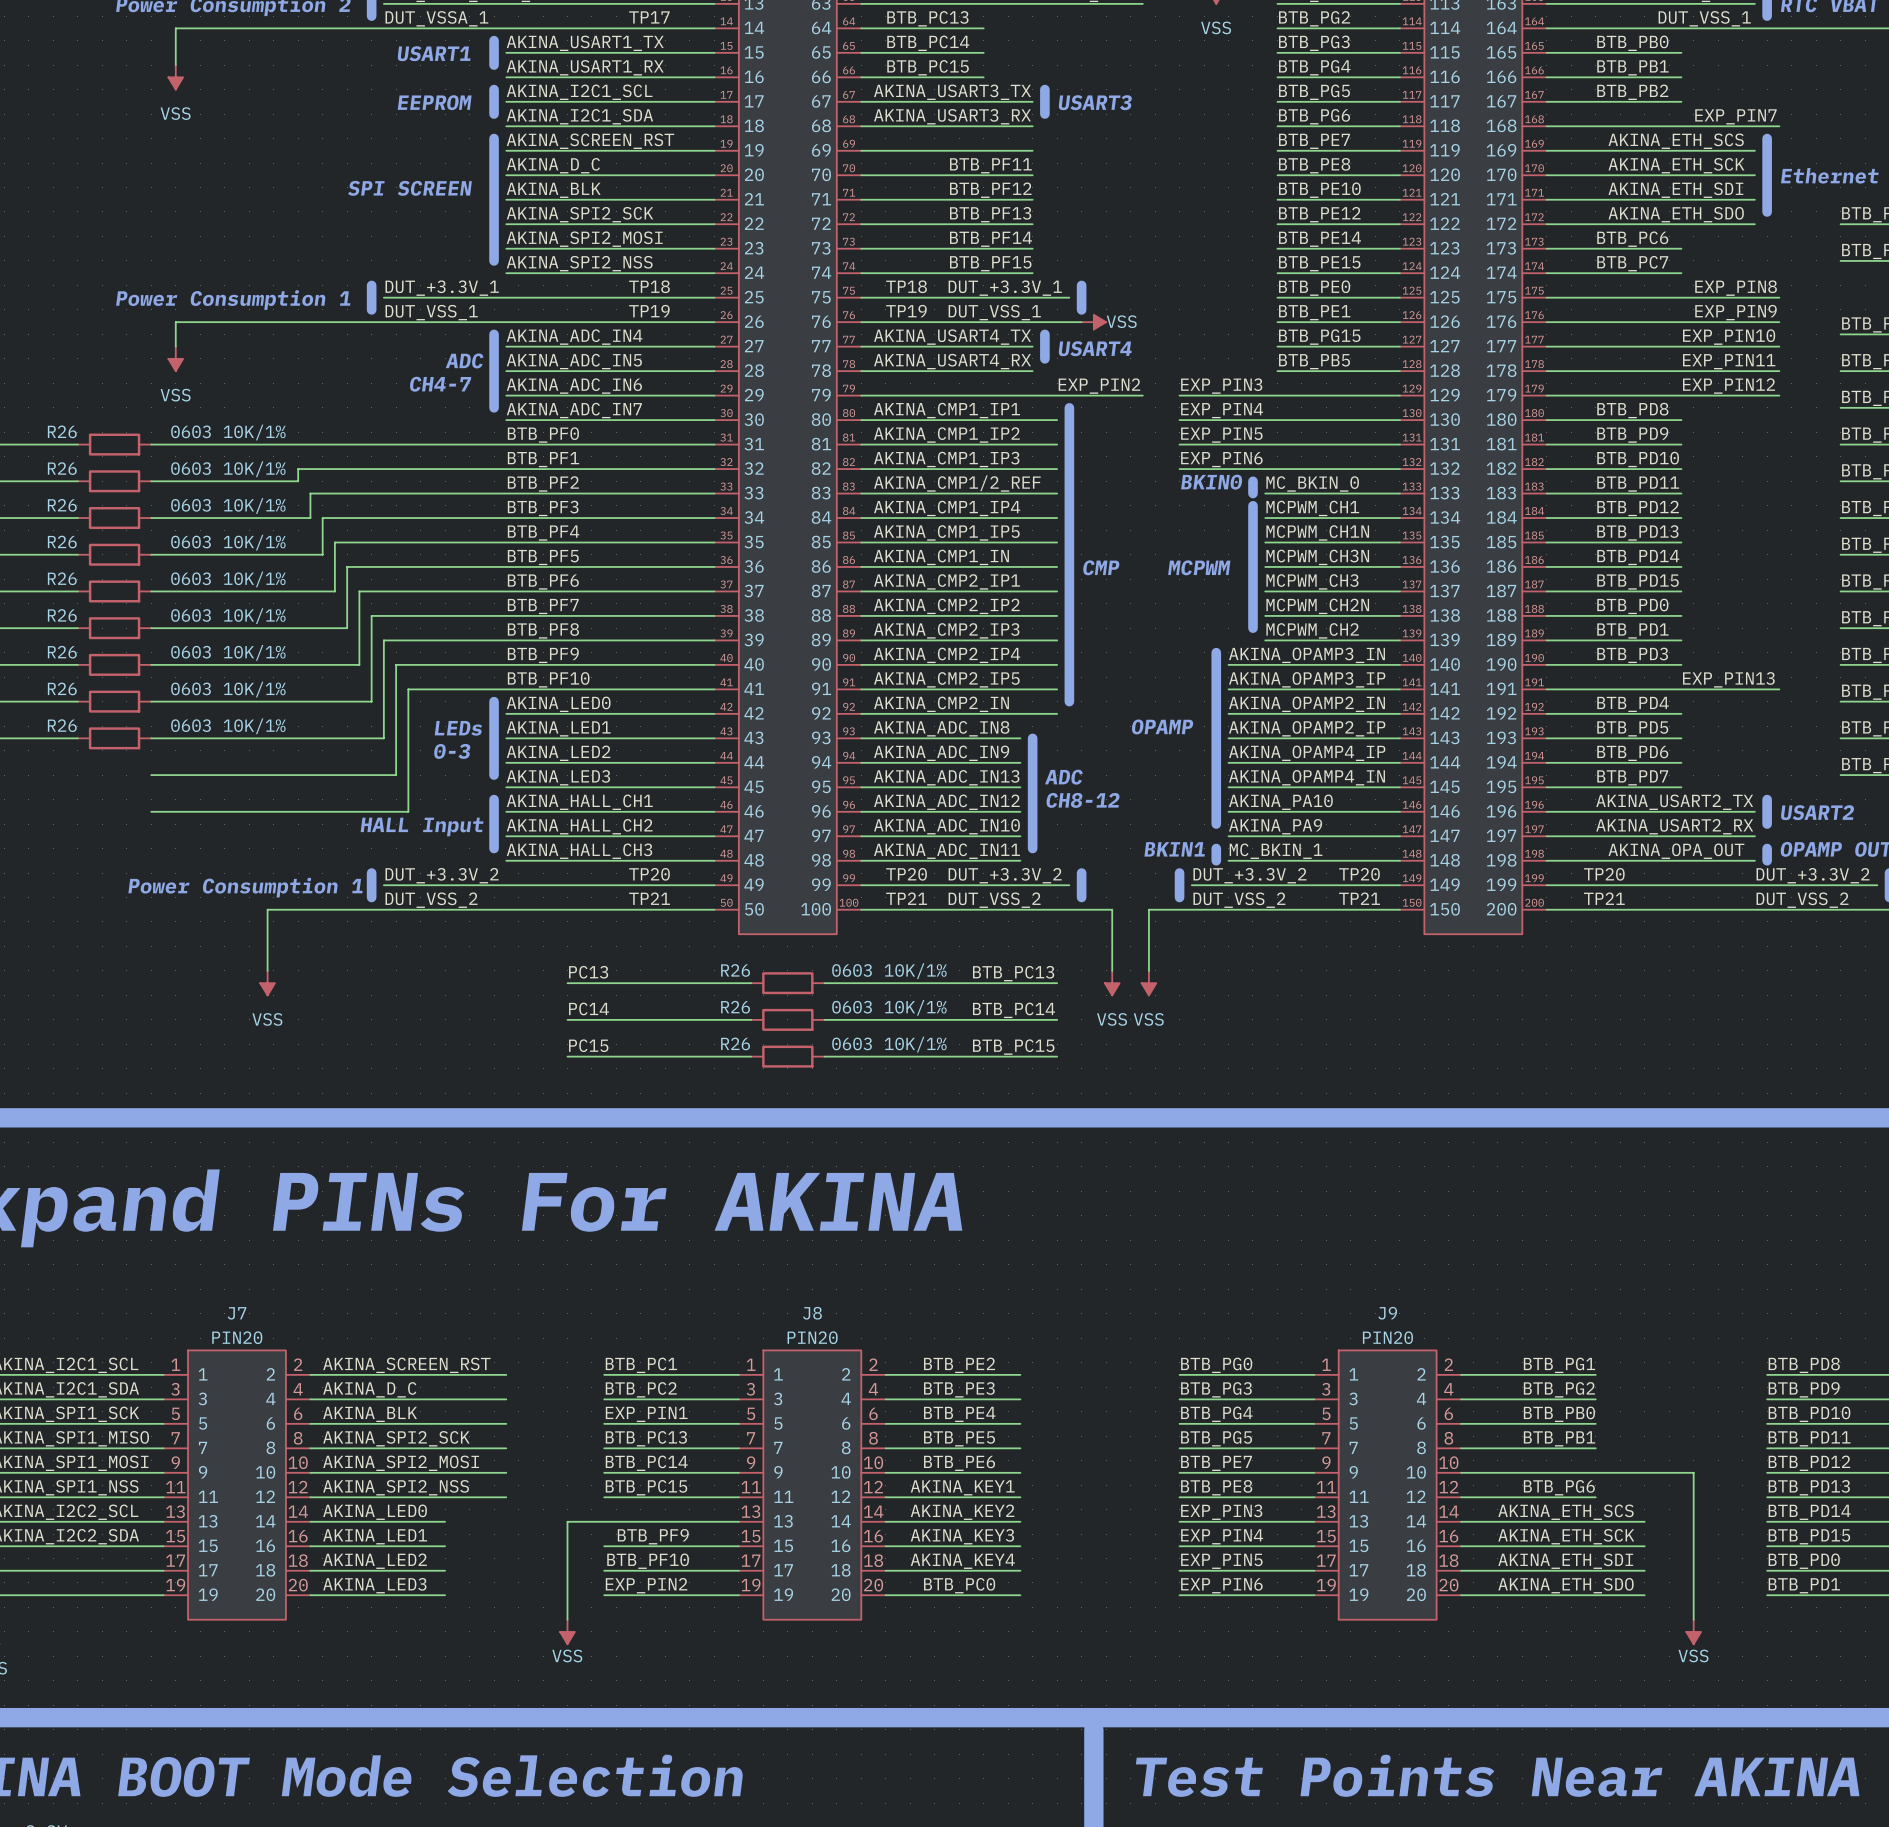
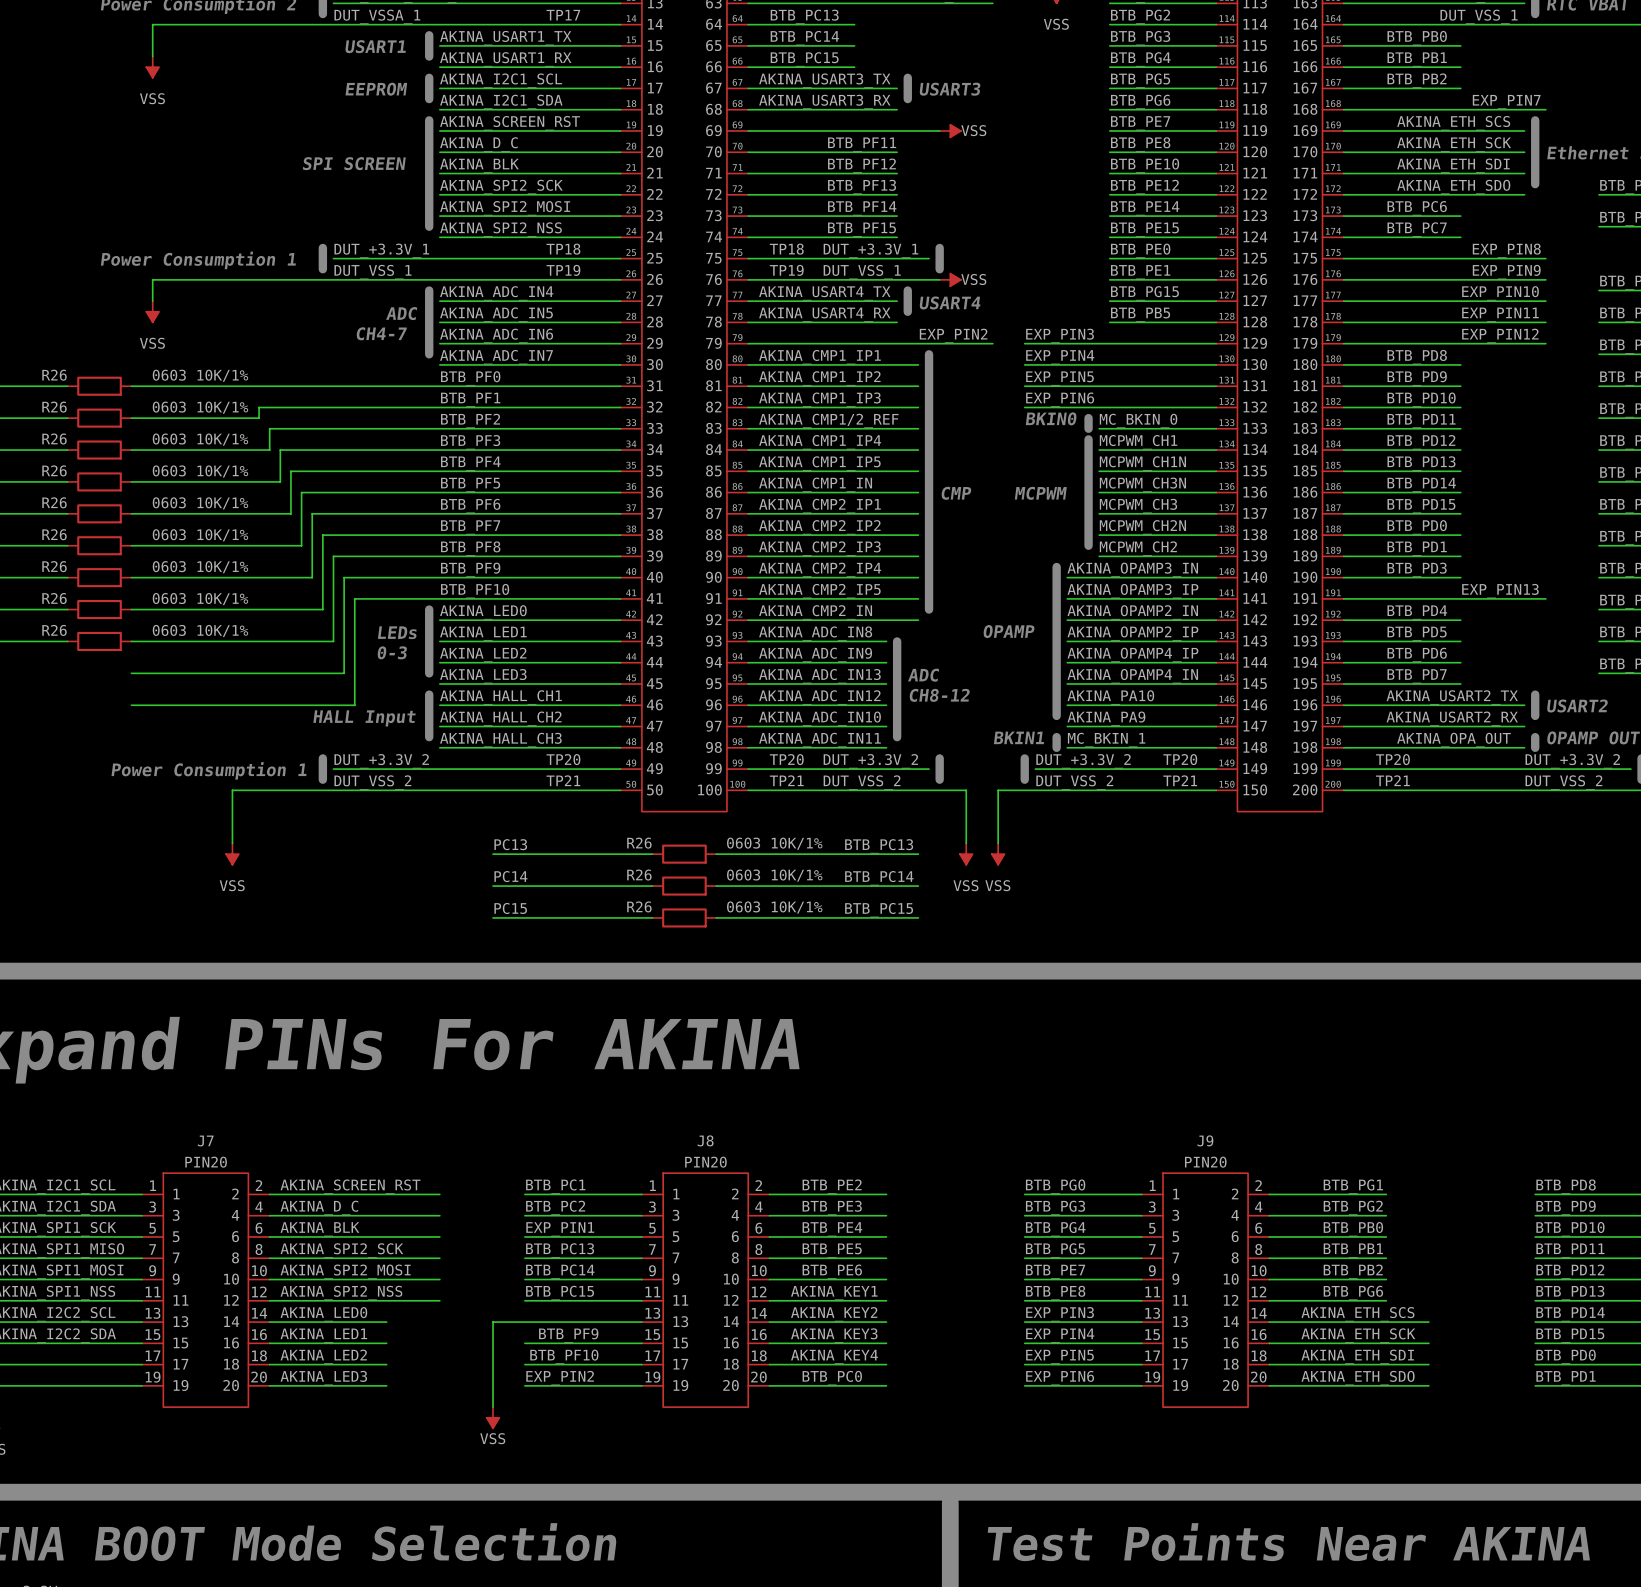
wire: none -> (897, 130) (939, 130)
power symbol: none -> VSS (950, 130)
label: none -> BTB_PB2 (1353, 1271)
wire: (1595, 1472) (1693, 1472) (1693, 1619) -> none
power symbol: VSS (1693, 1631) -> none

